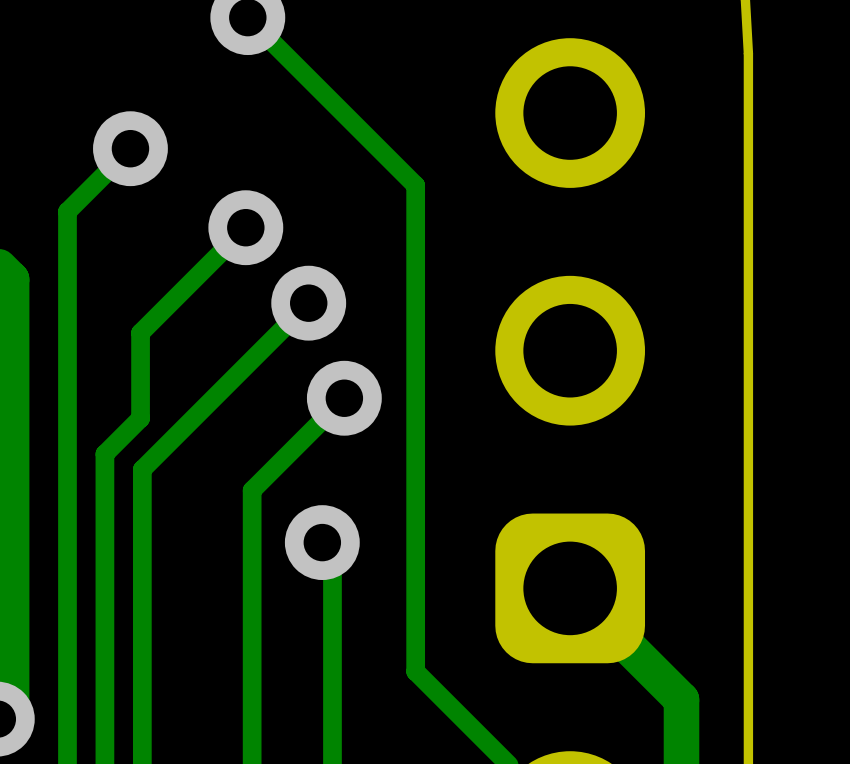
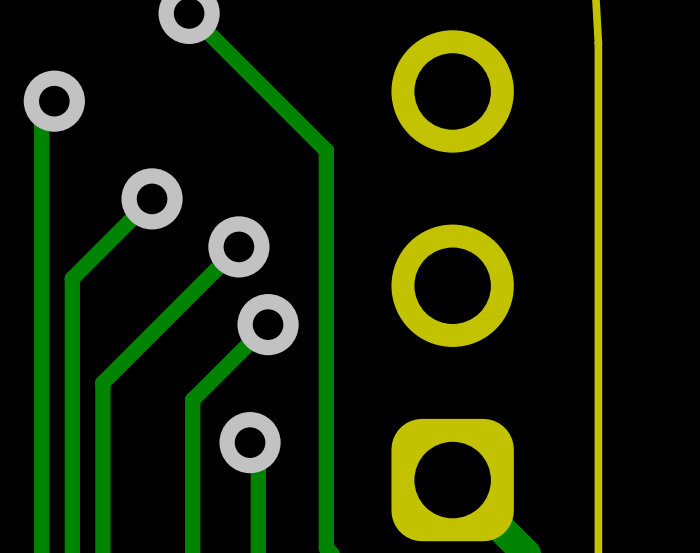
track: (130, 148) (67, 211) -> (54, 101) (41, 113) (41, 172)
via position: (130, 148) -> (54, 101)
track: (245, 227) (140, 332) (140, 418) (104, 454) -> (152, 198) (72, 278) (72, 370)
via position: (245, 227) -> (152, 198)

